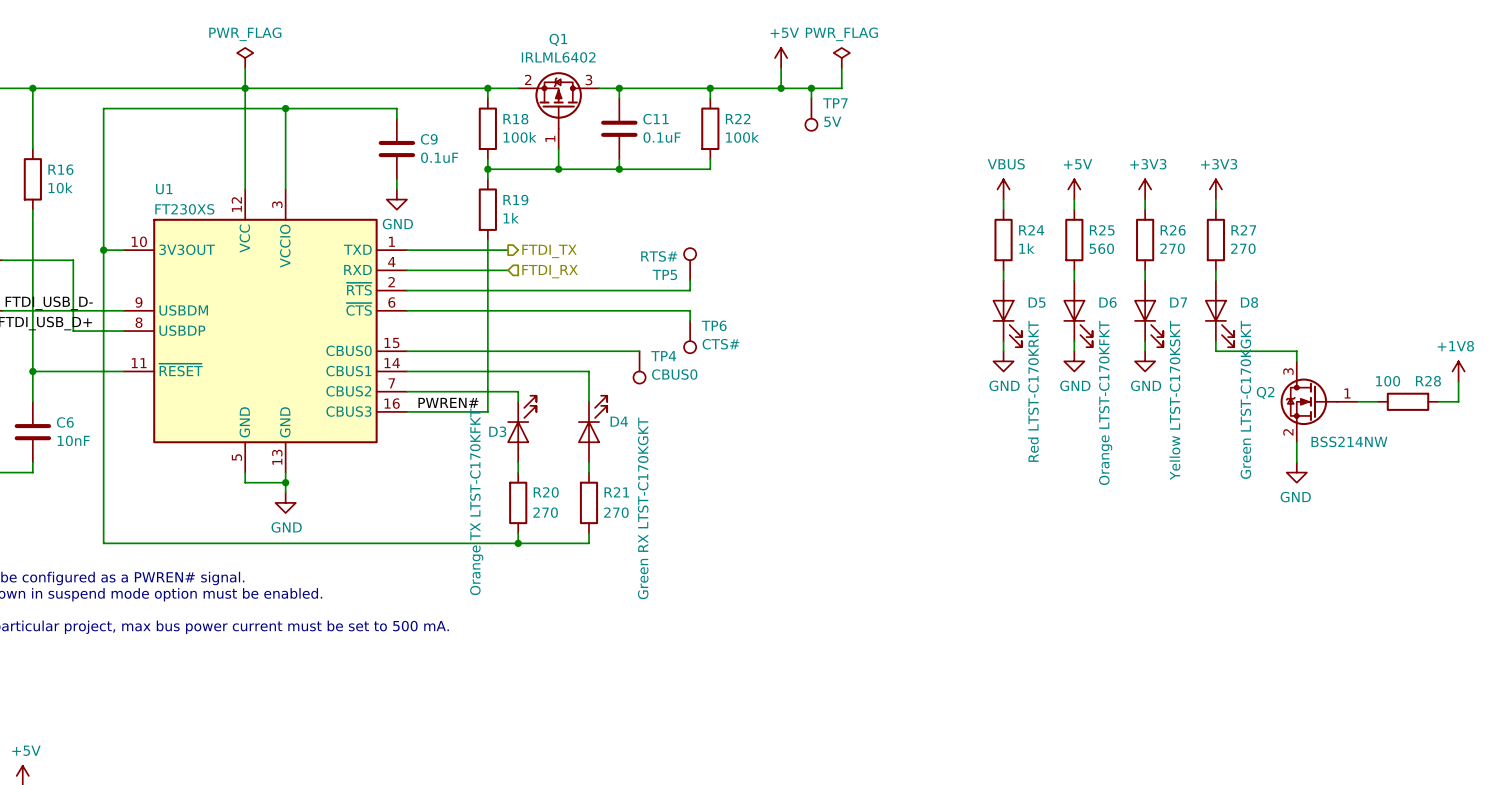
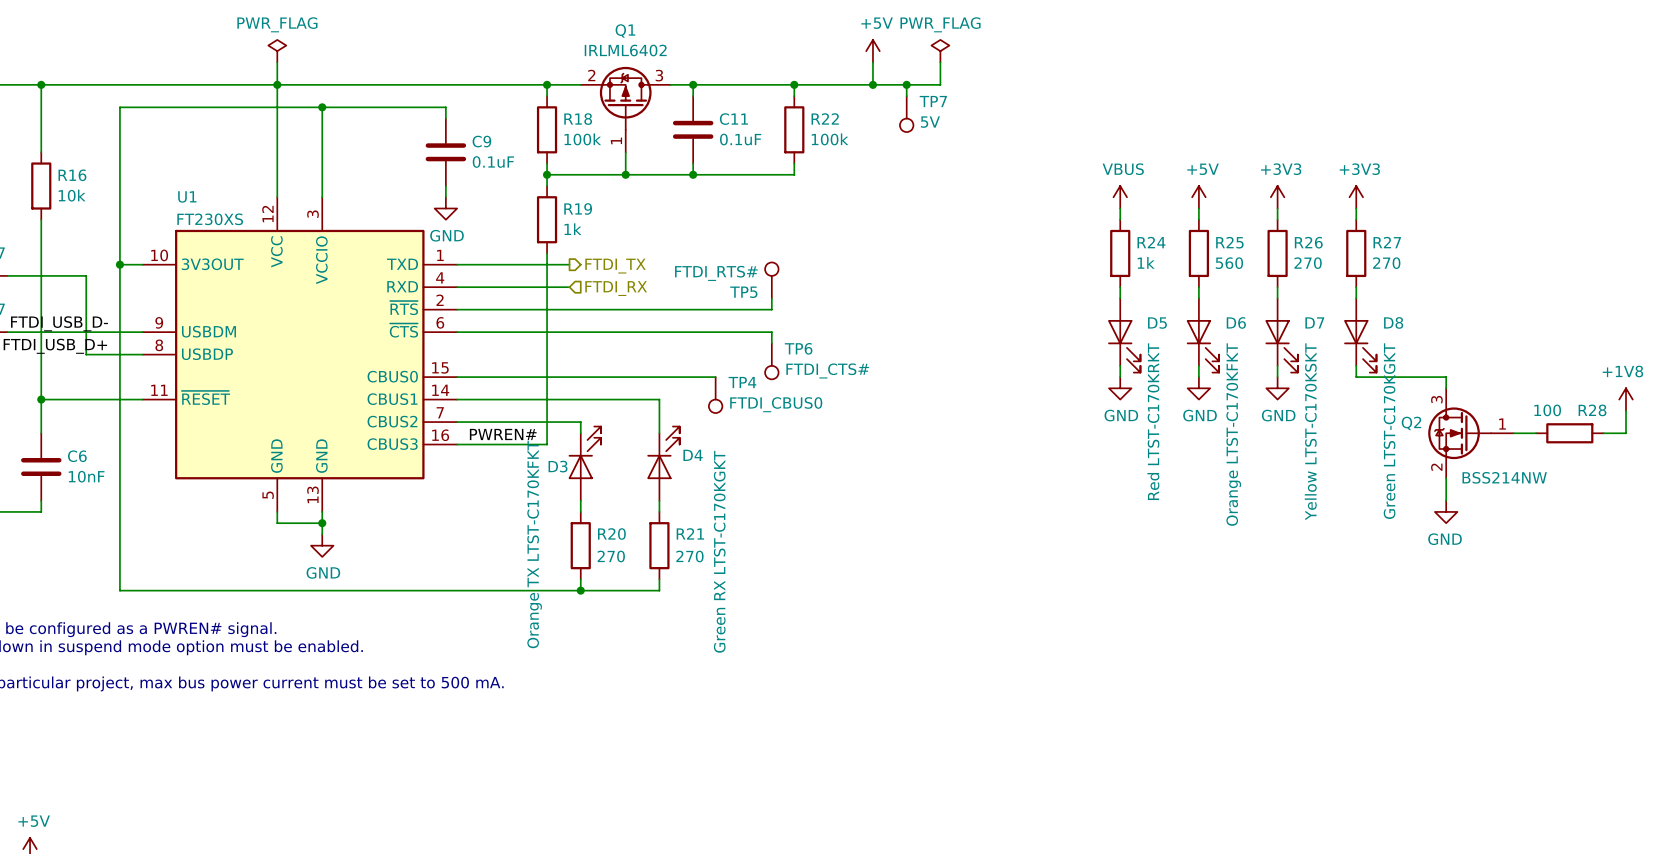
TP5 value: RTS# (659, 256) -> FTDI_RTS# (716, 273)
TP6 value: CTS# (720, 344) -> FTDI_CTS# (827, 370)
TP4 value: CBUS0 (674, 374) -> FTDI_CBUS0 (776, 404)

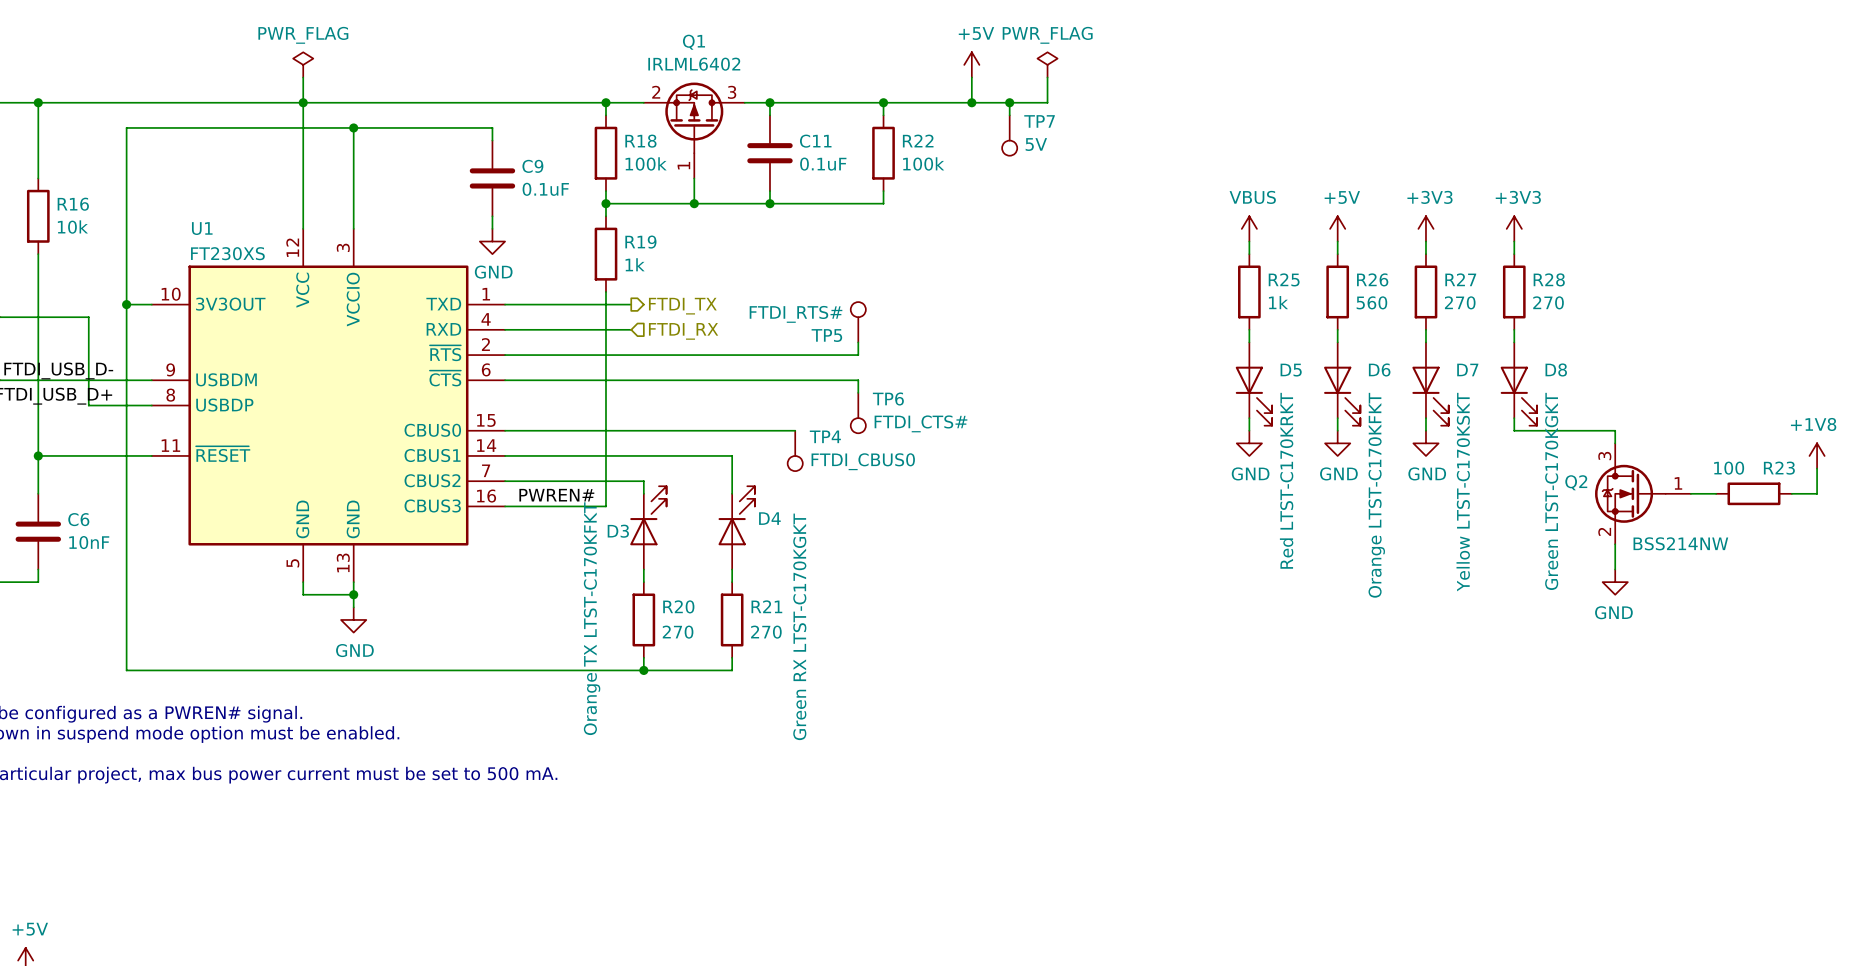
R24 name: R24 (1151, 242) -> R25 (1284, 279)
R25 name: R25 (1229, 242) -> R26 (1372, 279)
R26 name: R26 (1308, 242) -> R27 (1460, 279)
R27 name: R27 (1387, 242) -> R28 (1549, 279)
R28 name: R28 (1592, 410) -> R23 (1779, 468)

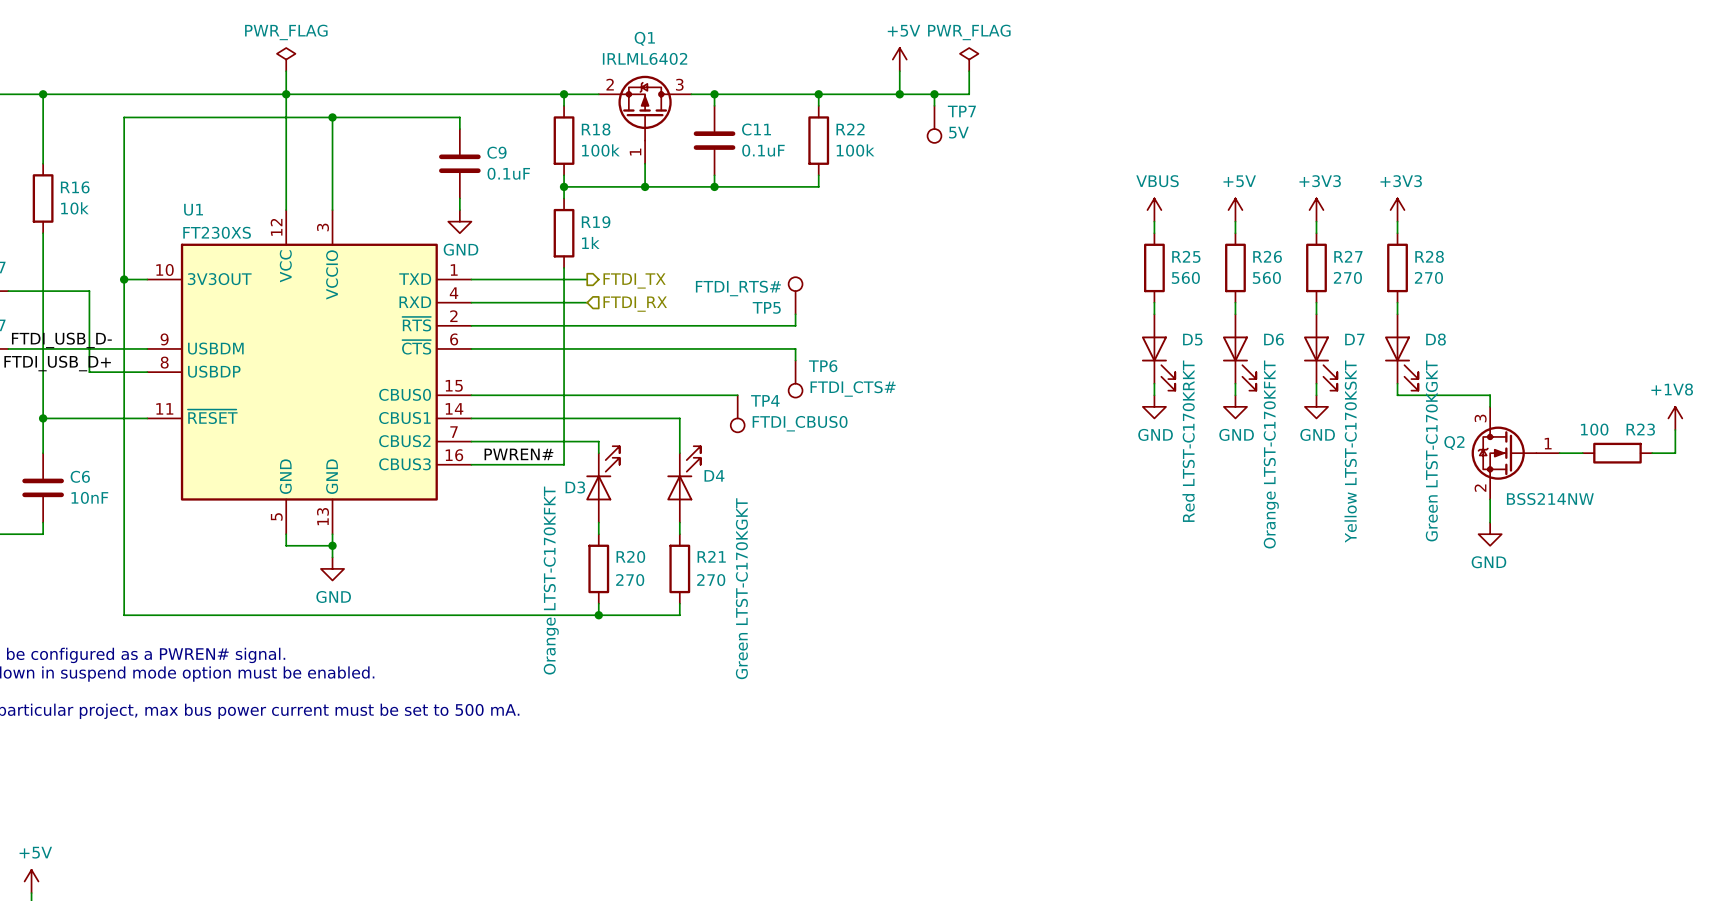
R25 value: 1k (1278, 302) -> 560 (1185, 277)
D3 value: Orange TX LTST-C170KFKT (592, 618) -> Orange LTST-C170KFKT (551, 580)
D4 value: Green RX LTST-C170KGKT (799, 626) -> Green LTST-C170KGKT (741, 588)

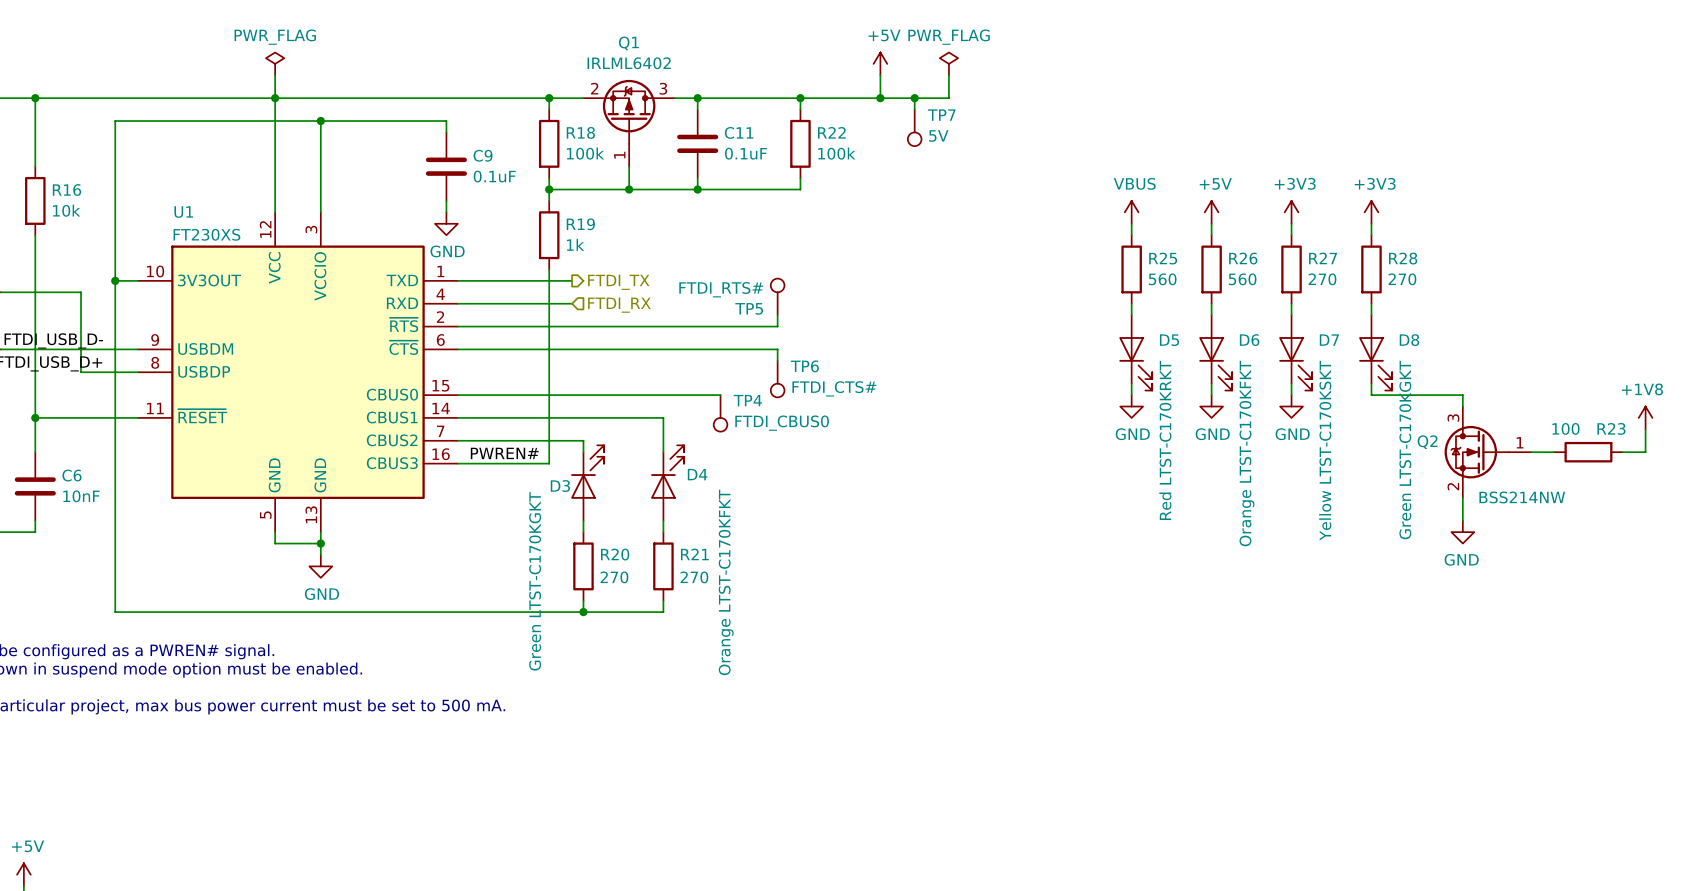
D3 value: Orange LTST-C170KFKT (551, 580) -> Green LTST-C170KGKT (535, 581)
D4 value: Green LTST-C170KGKT (741, 588) -> Orange LTST-C170KFKT (726, 582)

